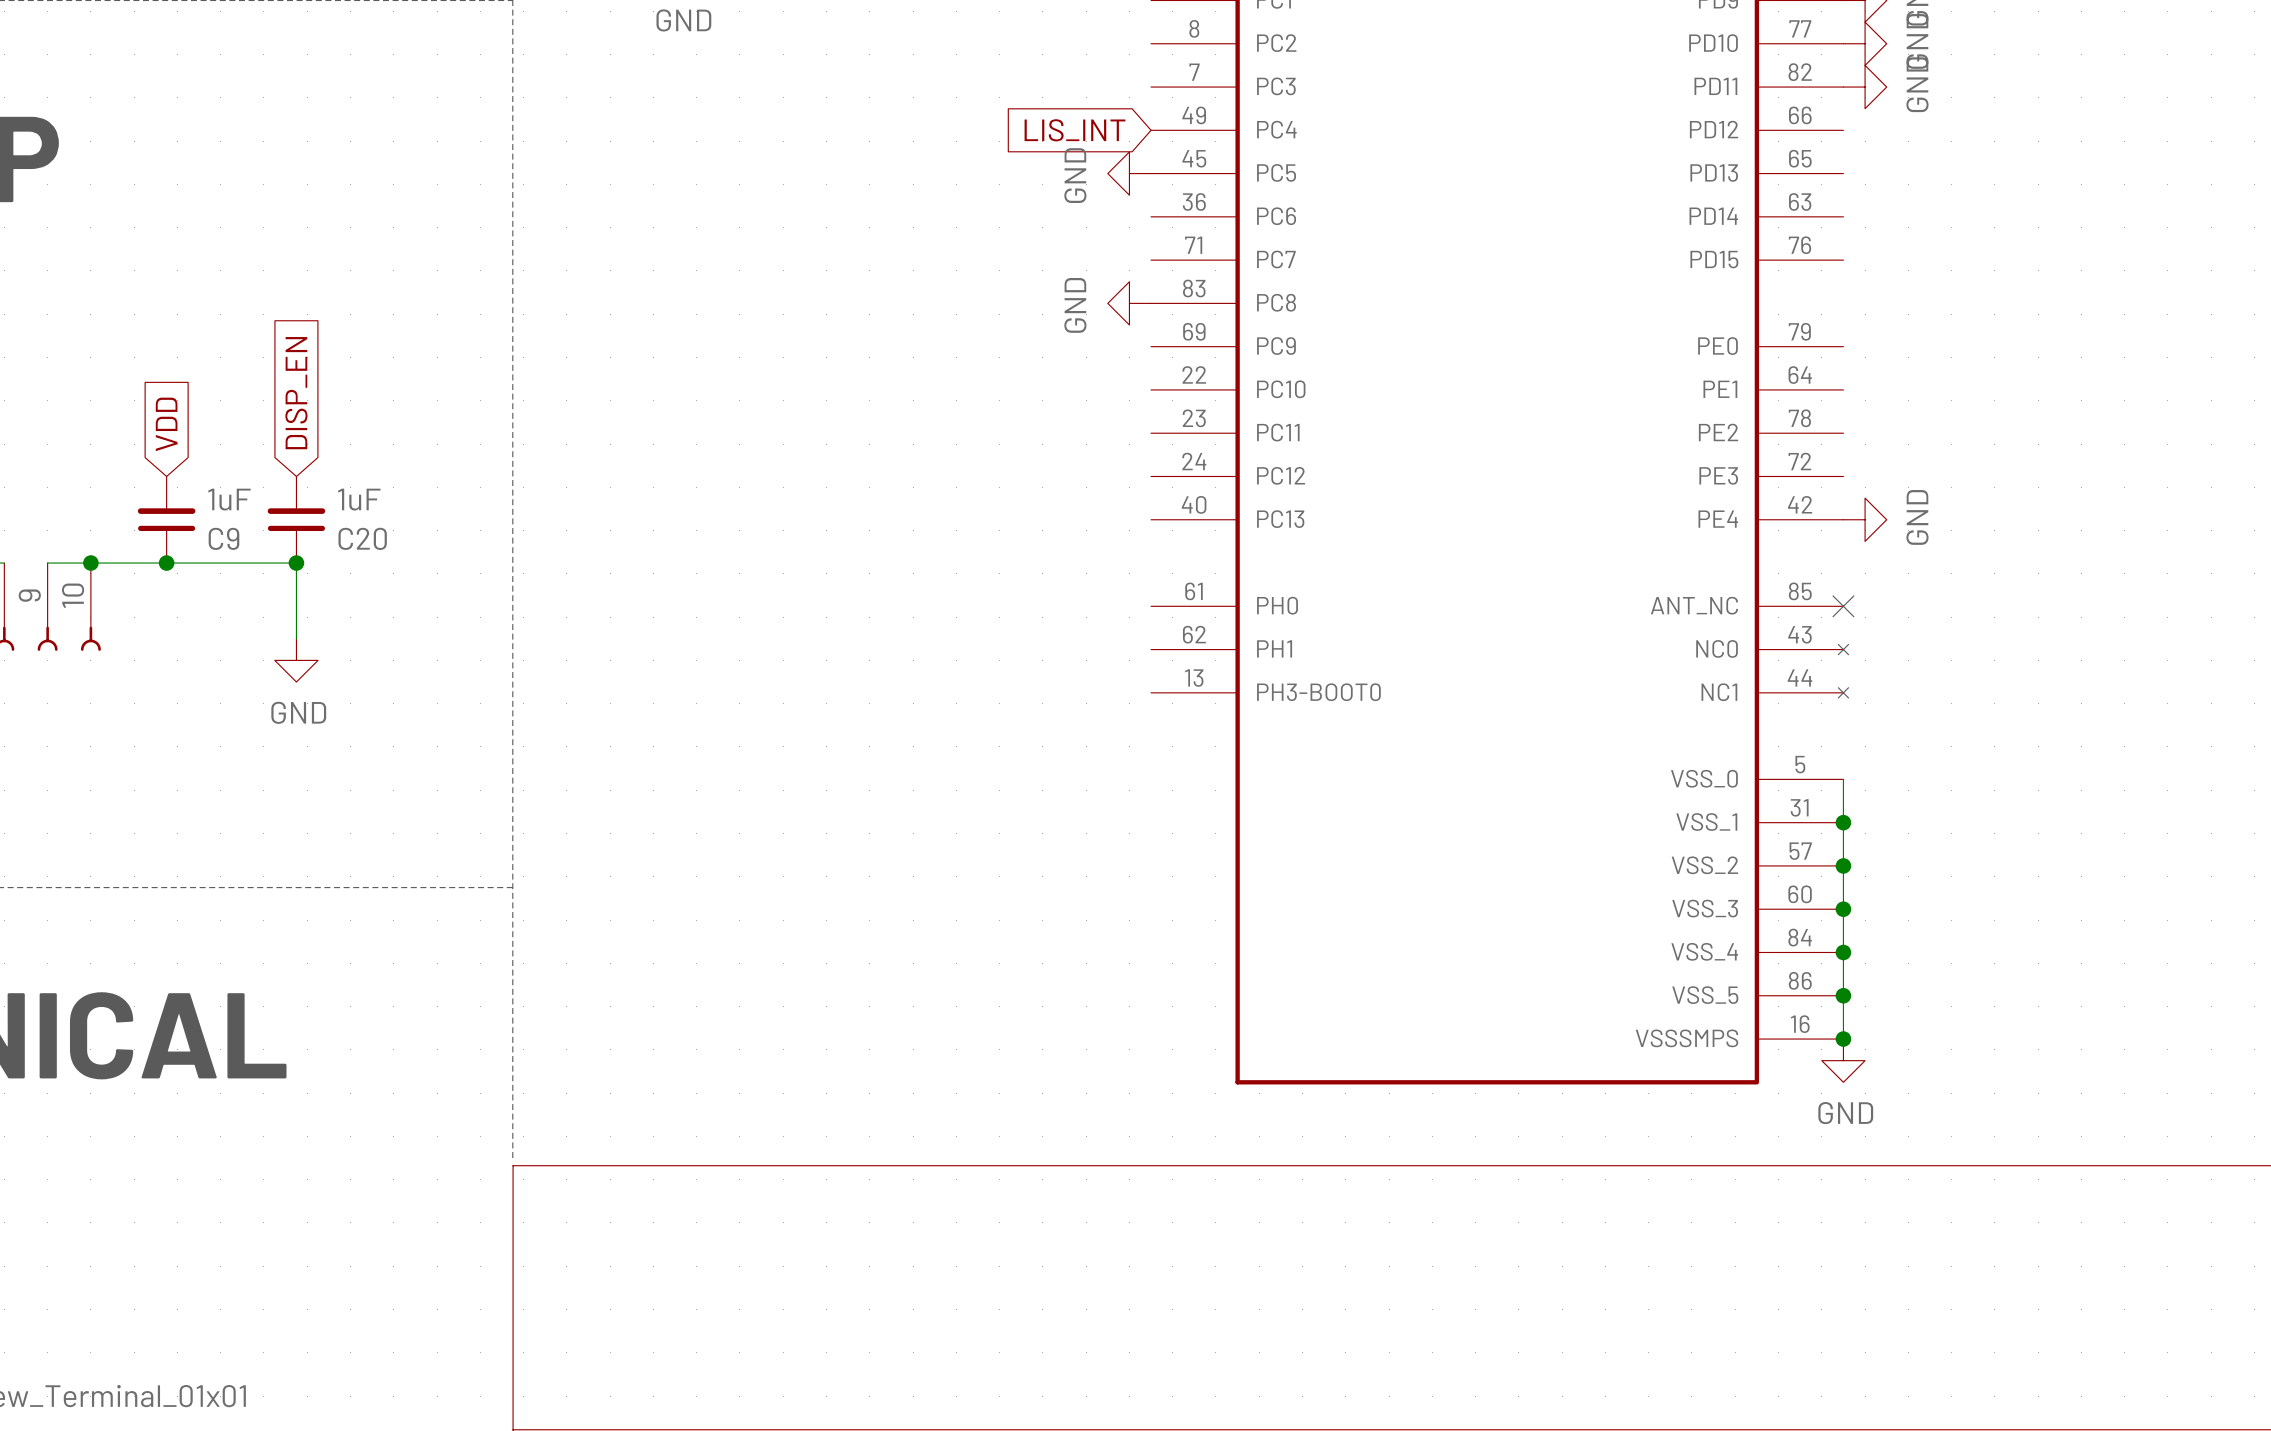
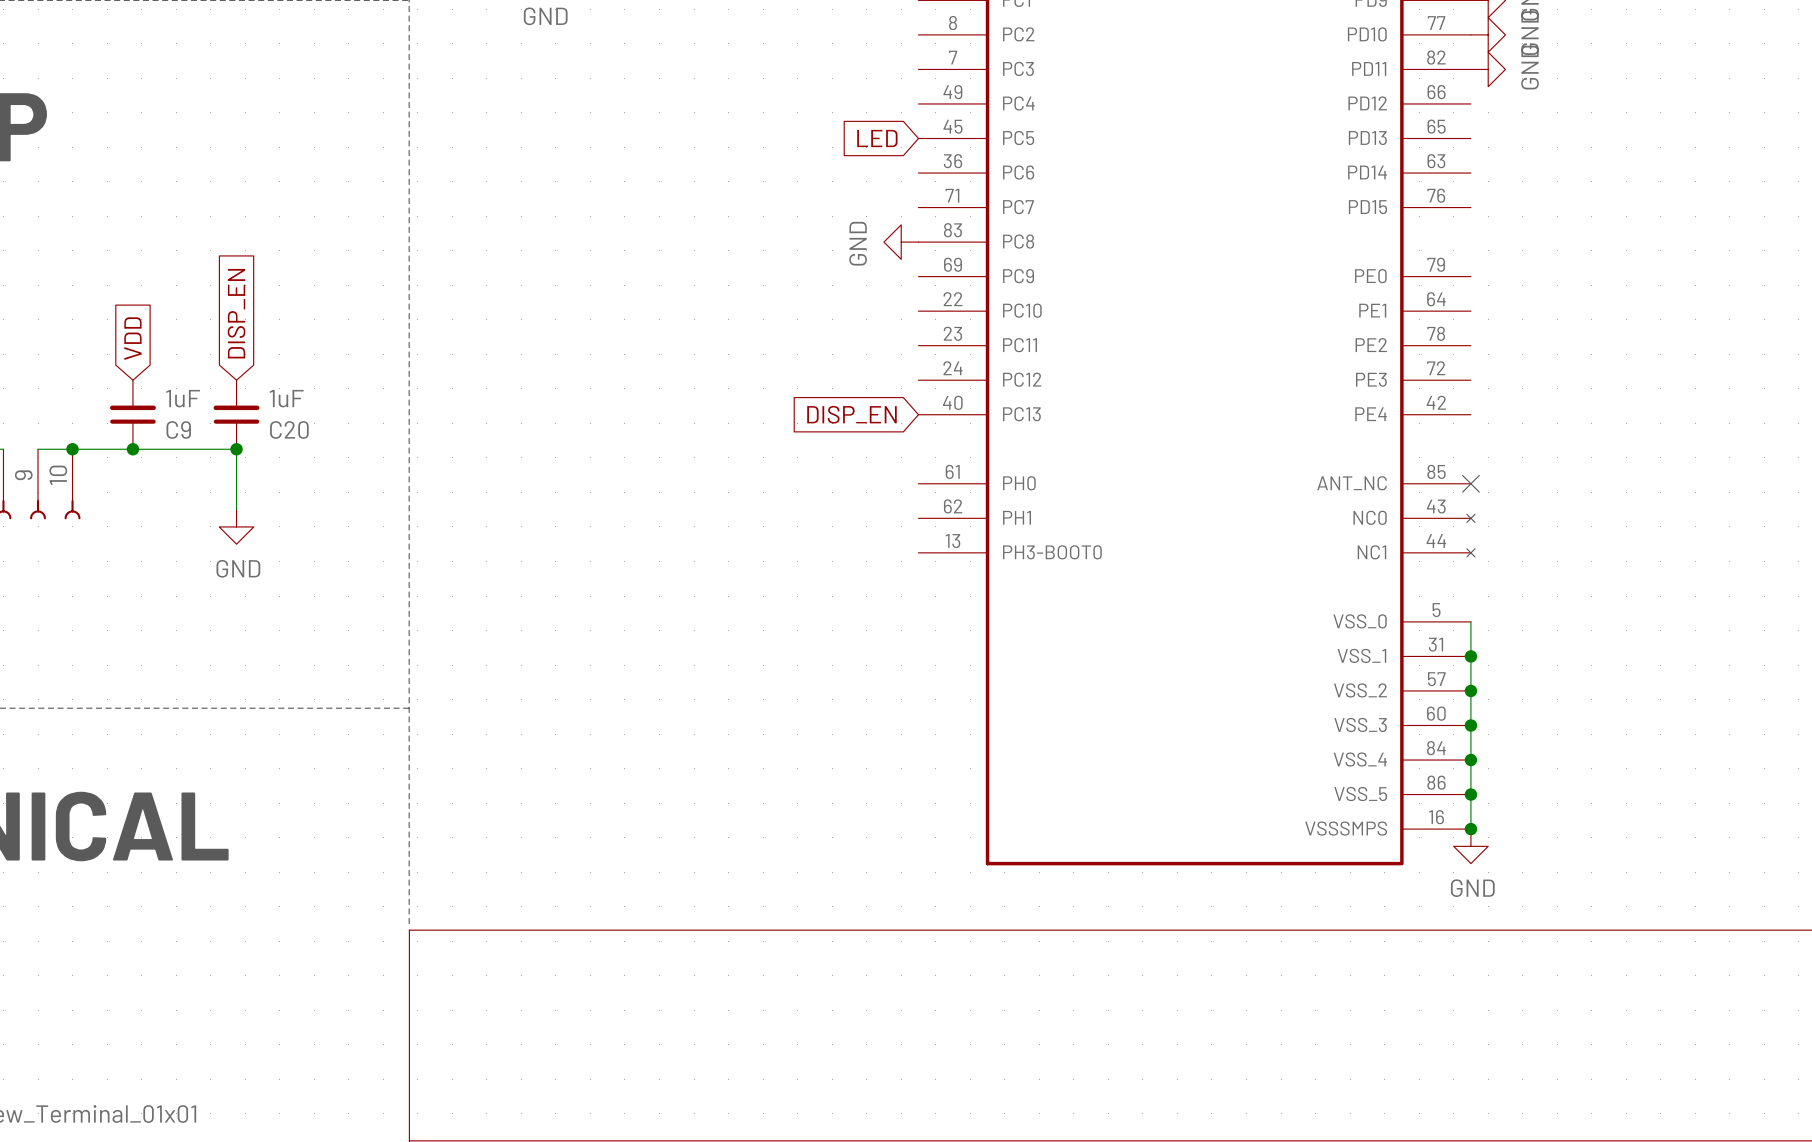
global label: LIS_INT (1074, 130) -> none
global label: none -> LED (877, 138)
power symbol: GND (1129, 173) -> none
global label: none -> DISP_EN (851, 414)
power symbol: GND (1865, 519) -> none

